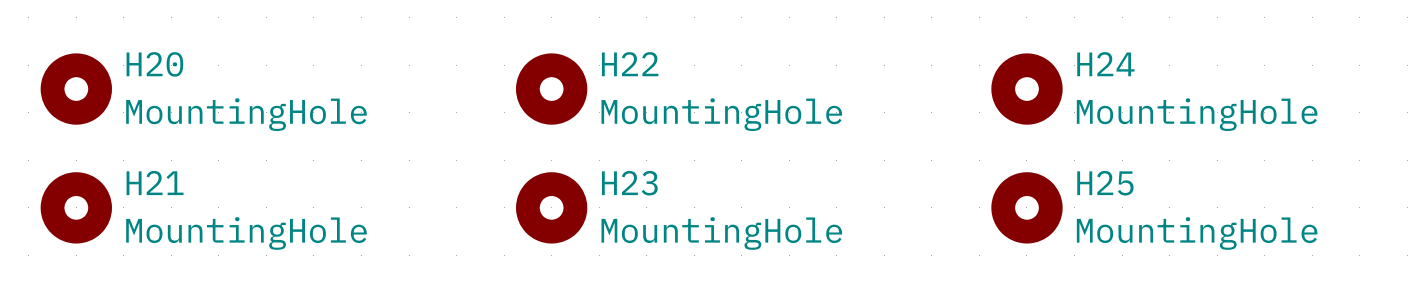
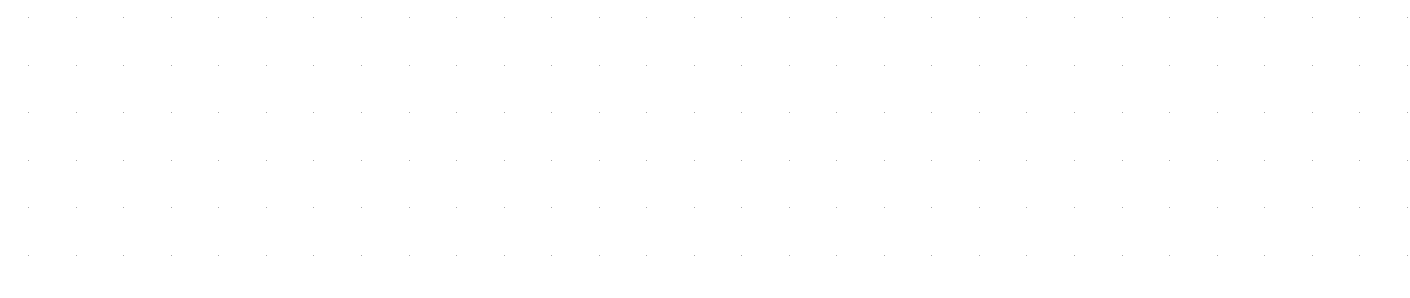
H20: MountingHole (76, 89) -> none
H22: MountingHole (551, 89) -> none
H24: MountingHole (1026, 89) -> none
H21: MountingHole (76, 207) -> none
H23: MountingHole (551, 207) -> none
H25: MountingHole (1026, 207) -> none

